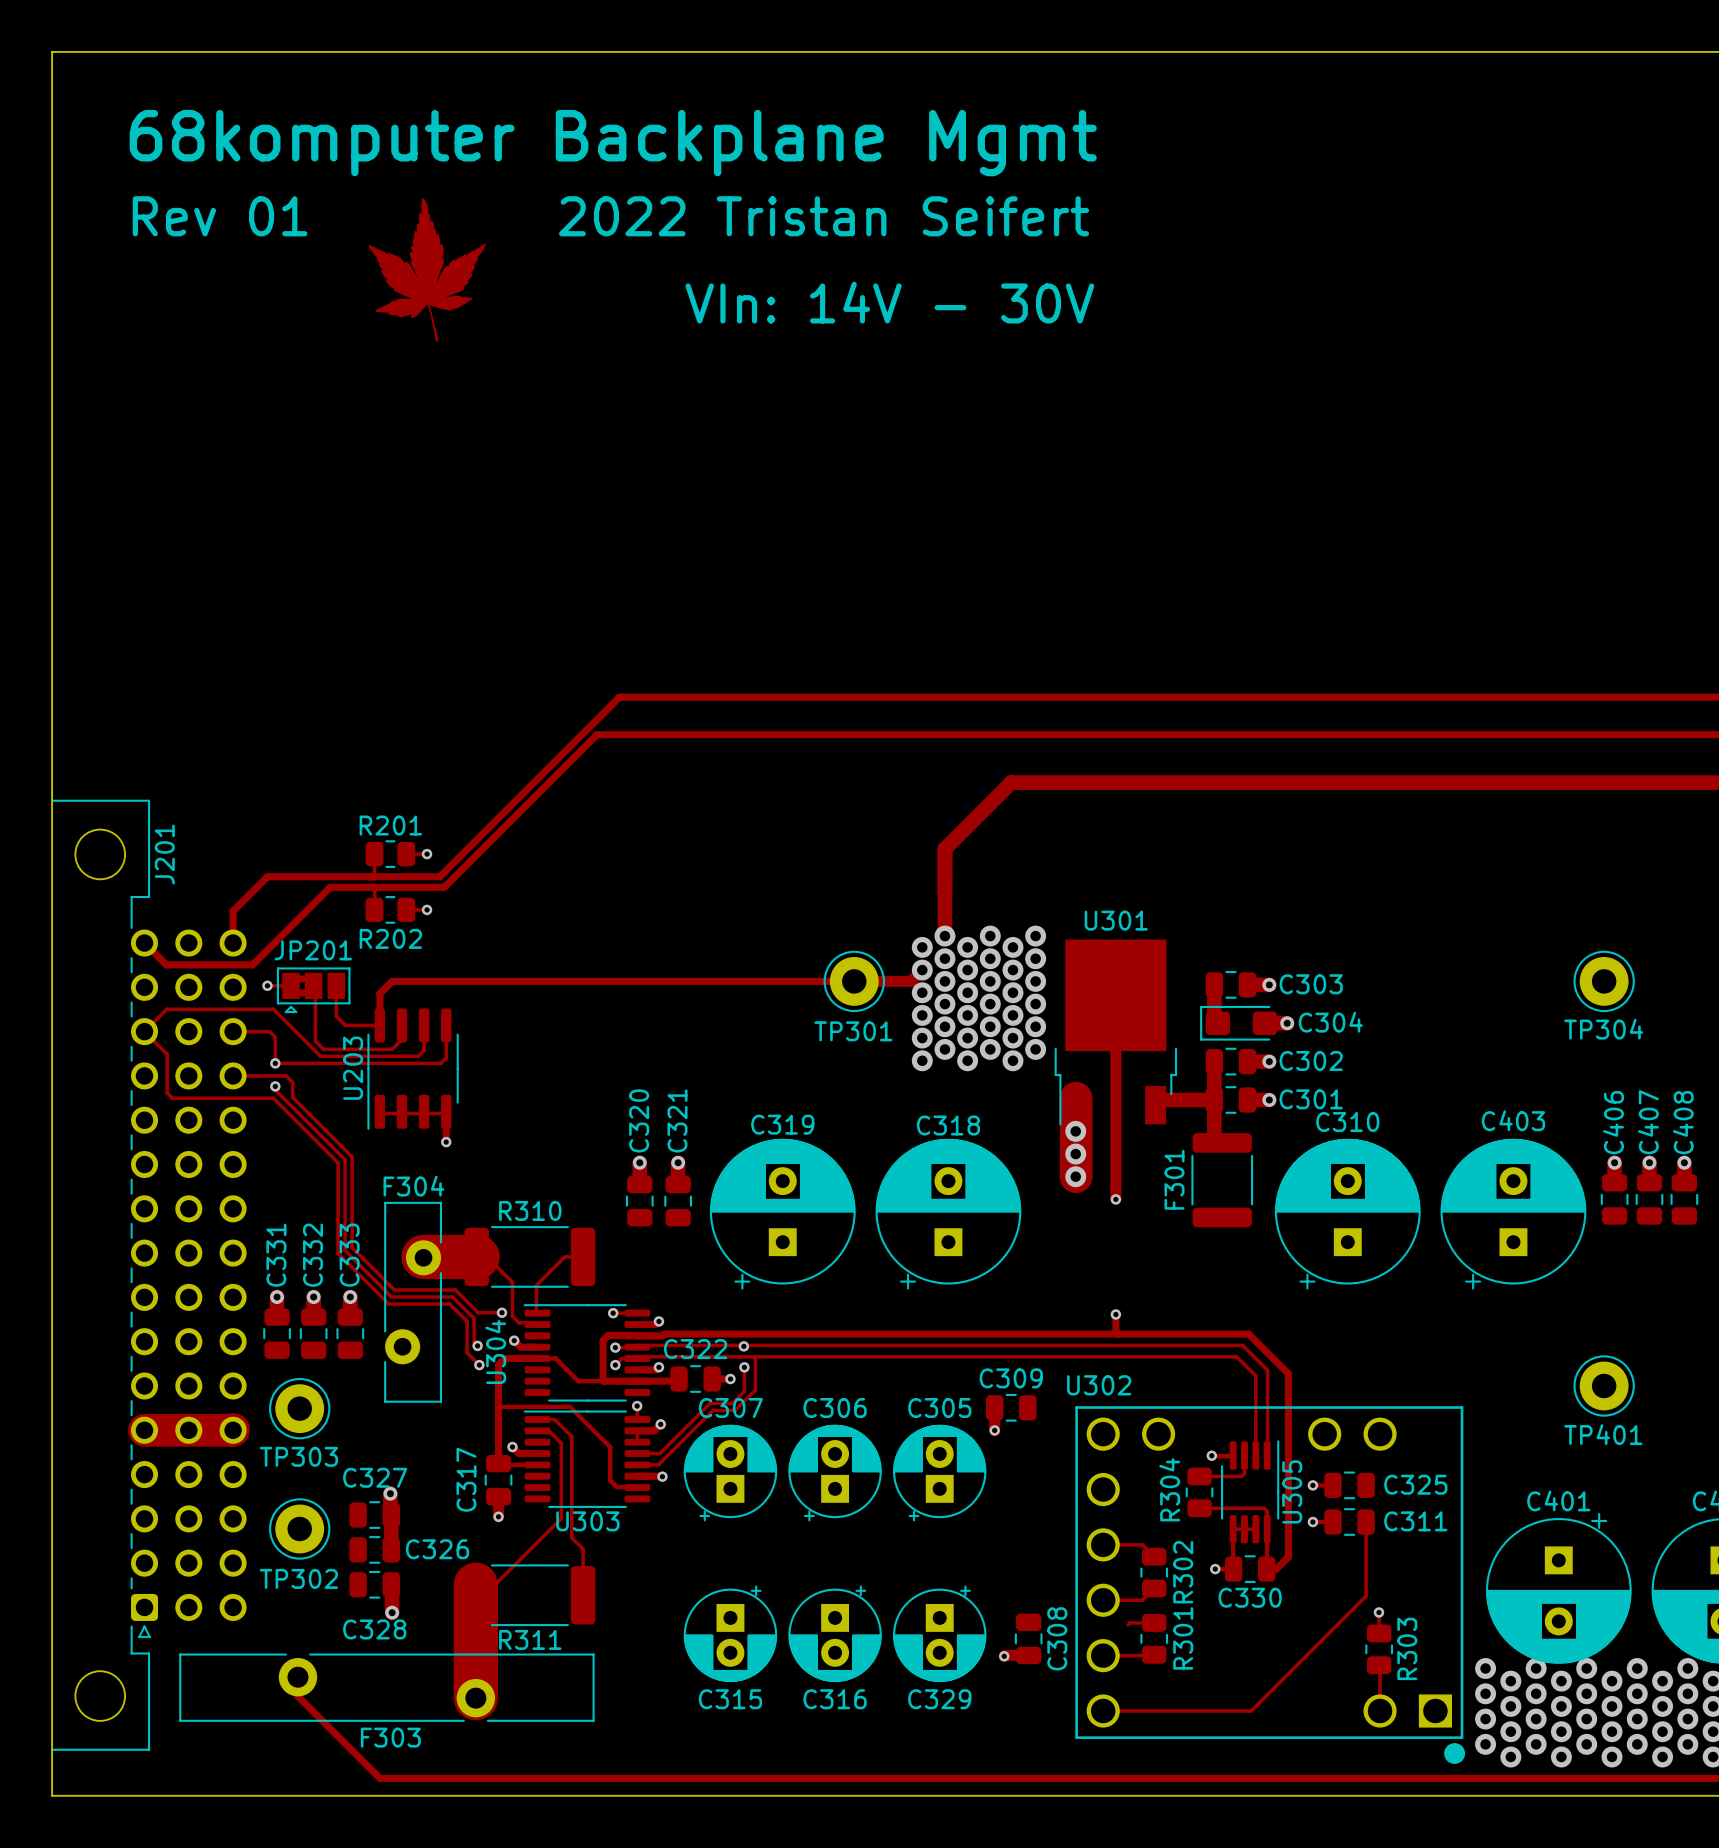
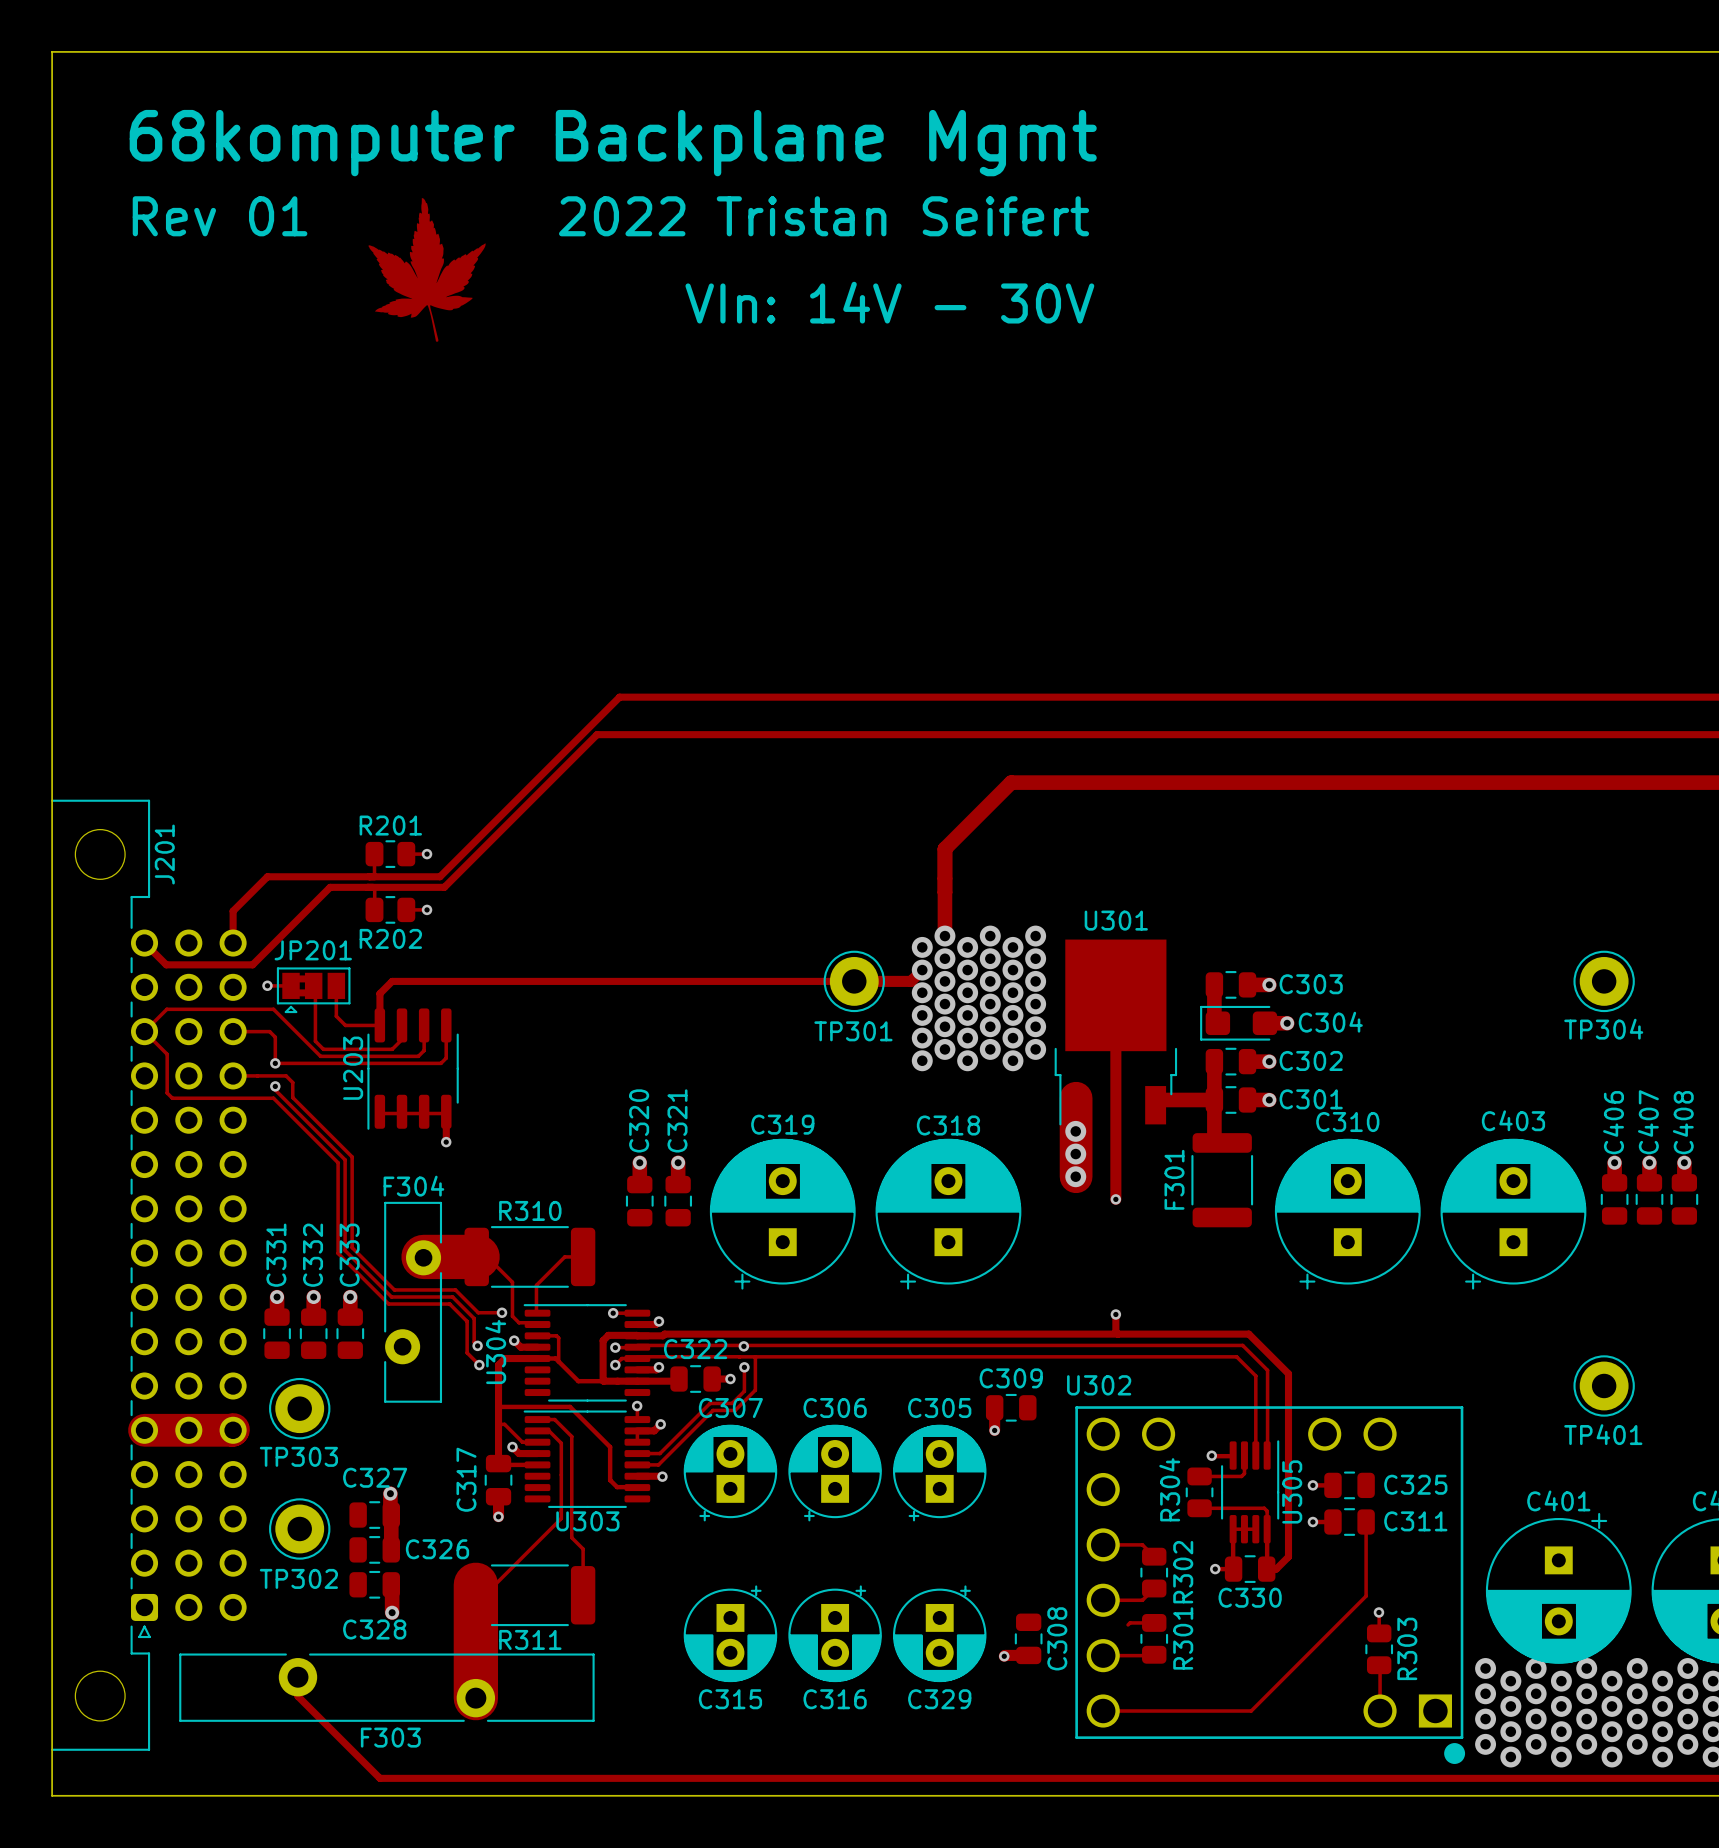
track: none -> (537, 1335) (556, 1335) (558, 1338) (558, 1361)
track: none -> (498, 1424) (504, 1424) (522, 1442) (537, 1442)

